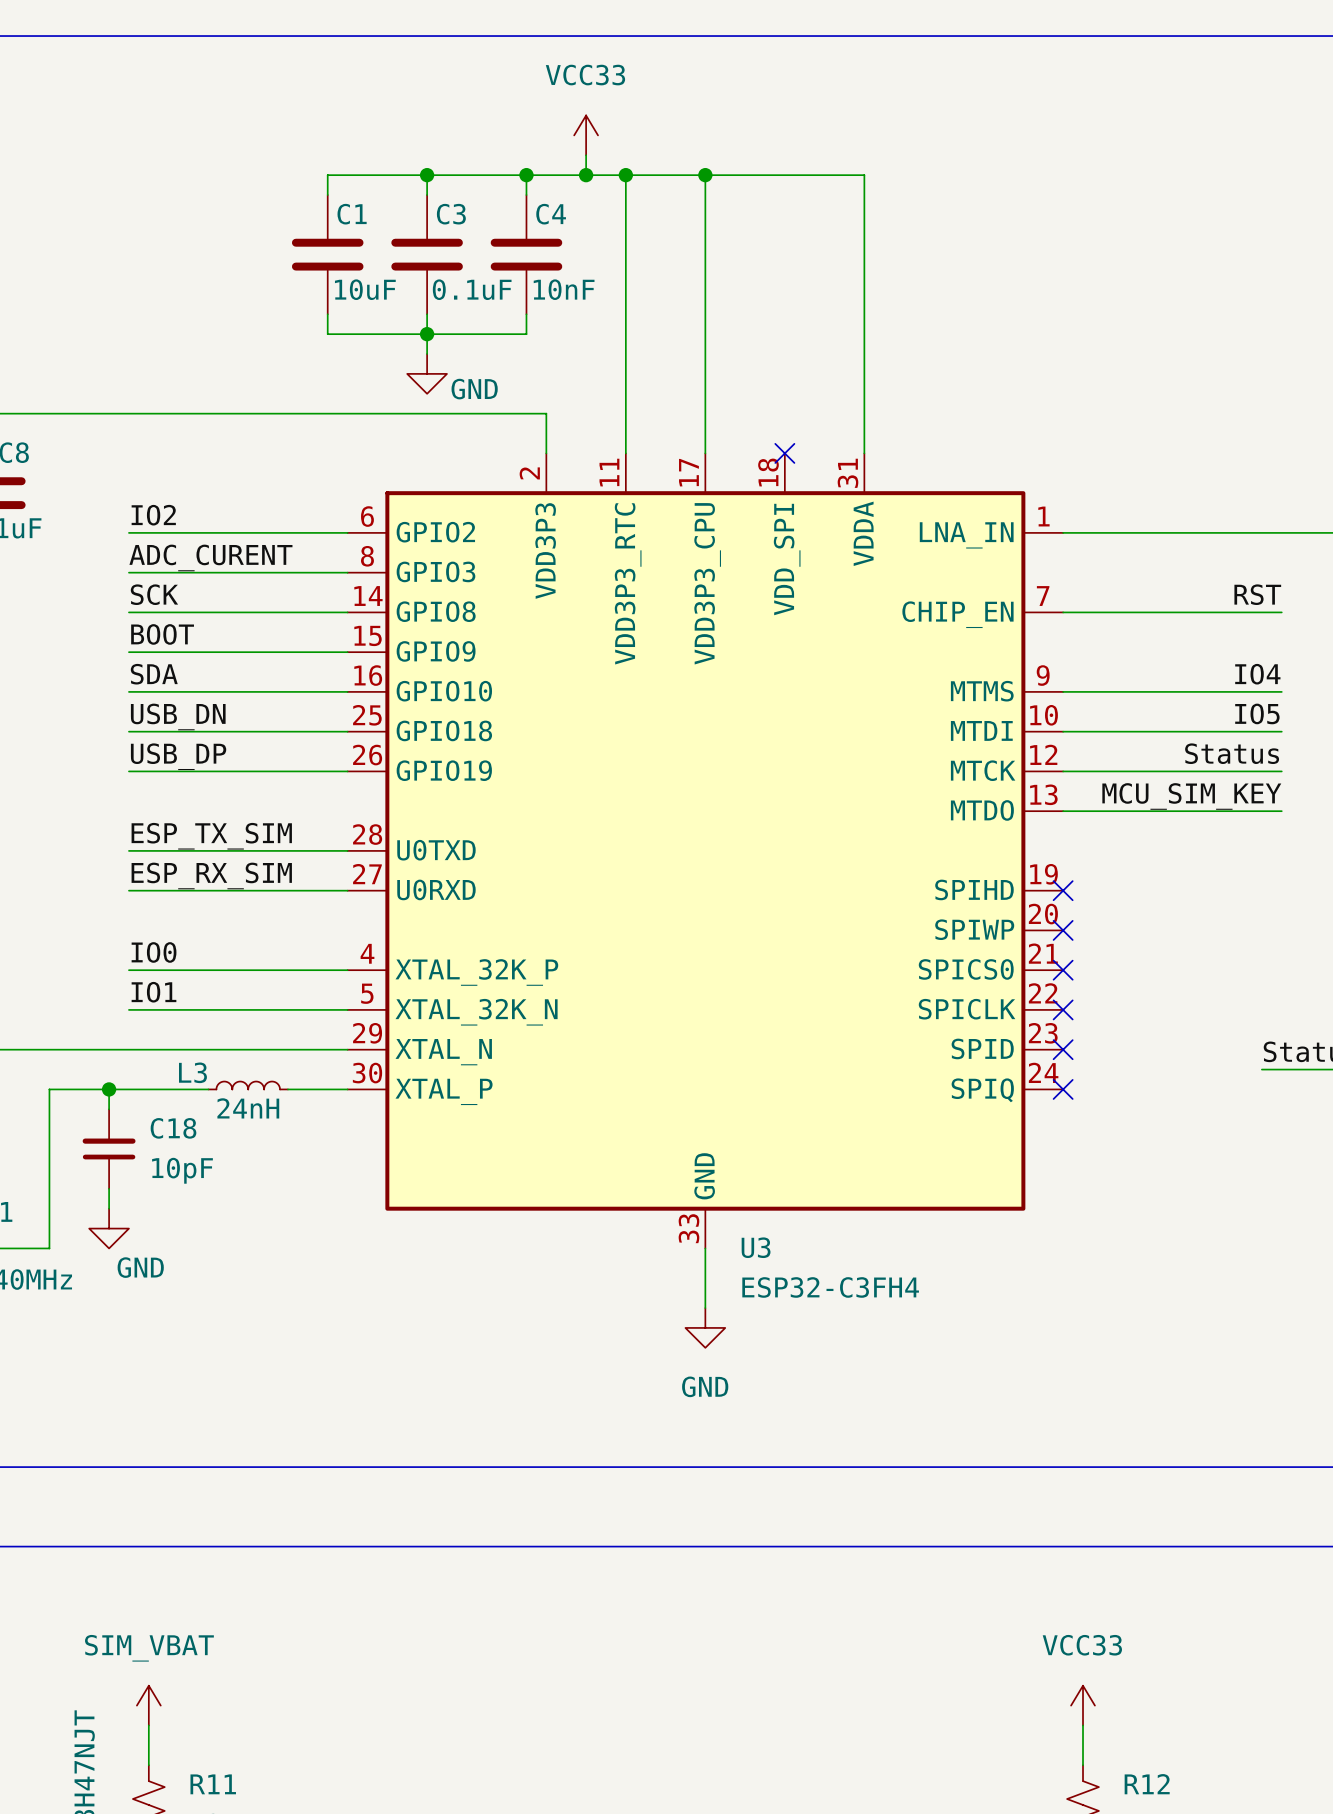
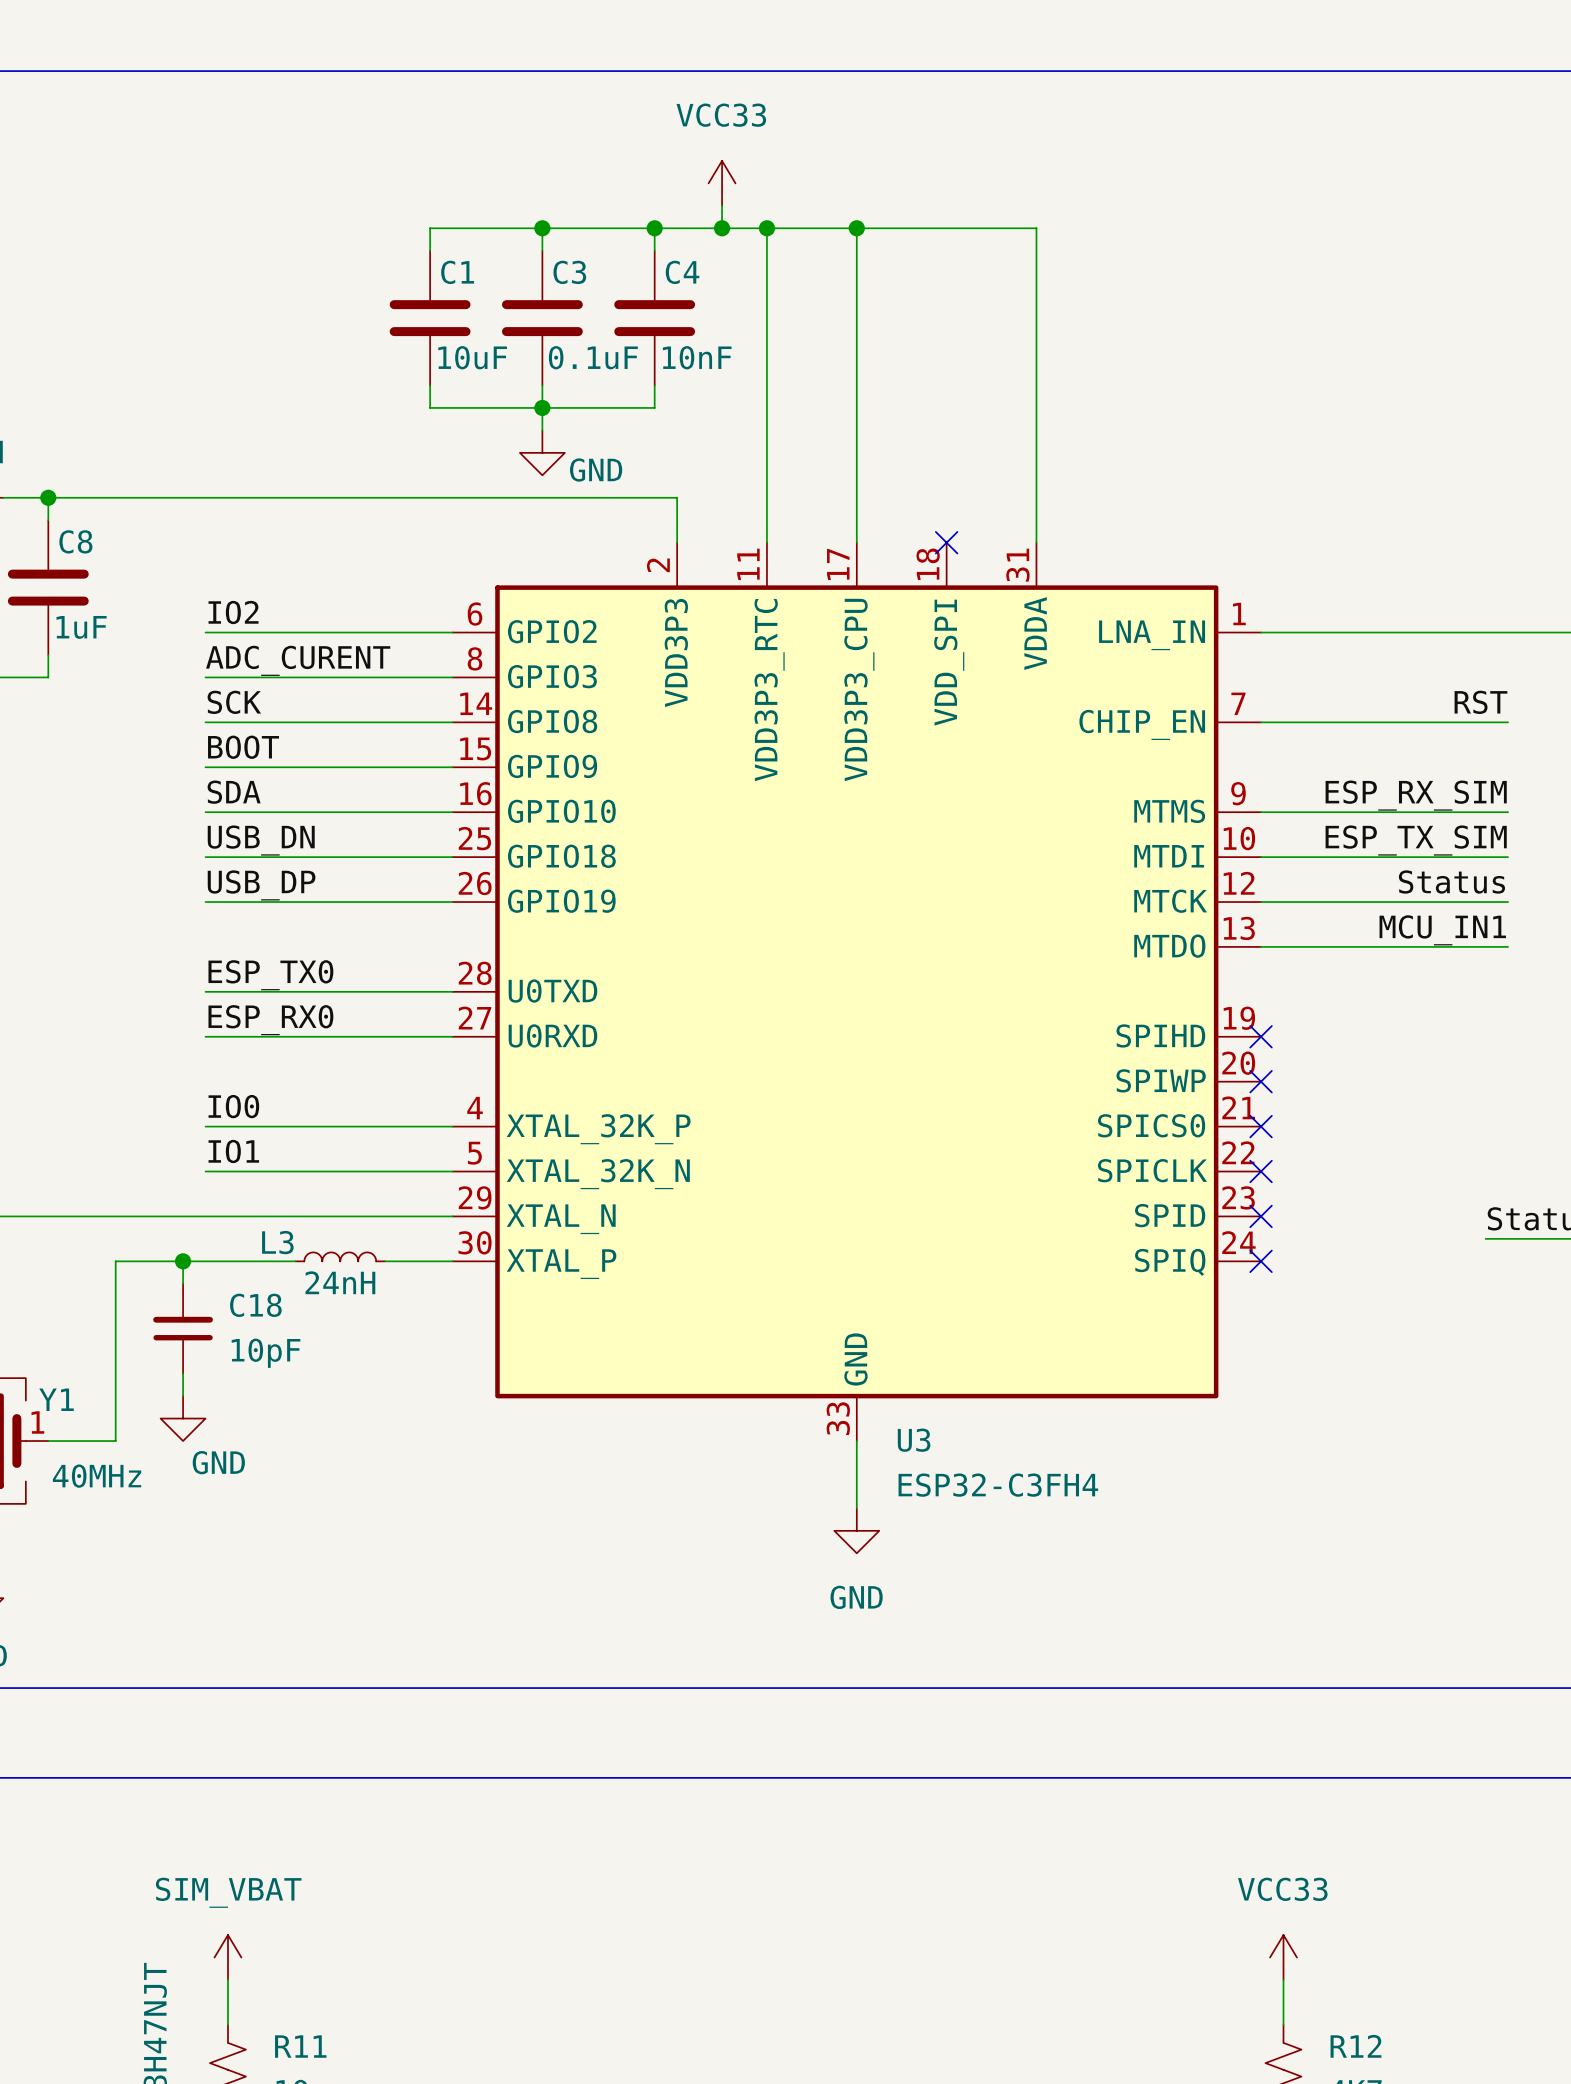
label: IO4 (1257, 674) -> ESP_RX_SIM (1416, 795)
label: IO5 (1257, 713) -> ESP_TX_SIM (1416, 840)
label: MCU_SIM_KEY (1191, 796) -> MCU_IN1 (1442, 930)
label: ESP_TX_SIM (211, 836) -> ESP_TX0 (270, 975)
label: ESP_RX_SIM (211, 875) -> ESP_RX0 (270, 1020)

